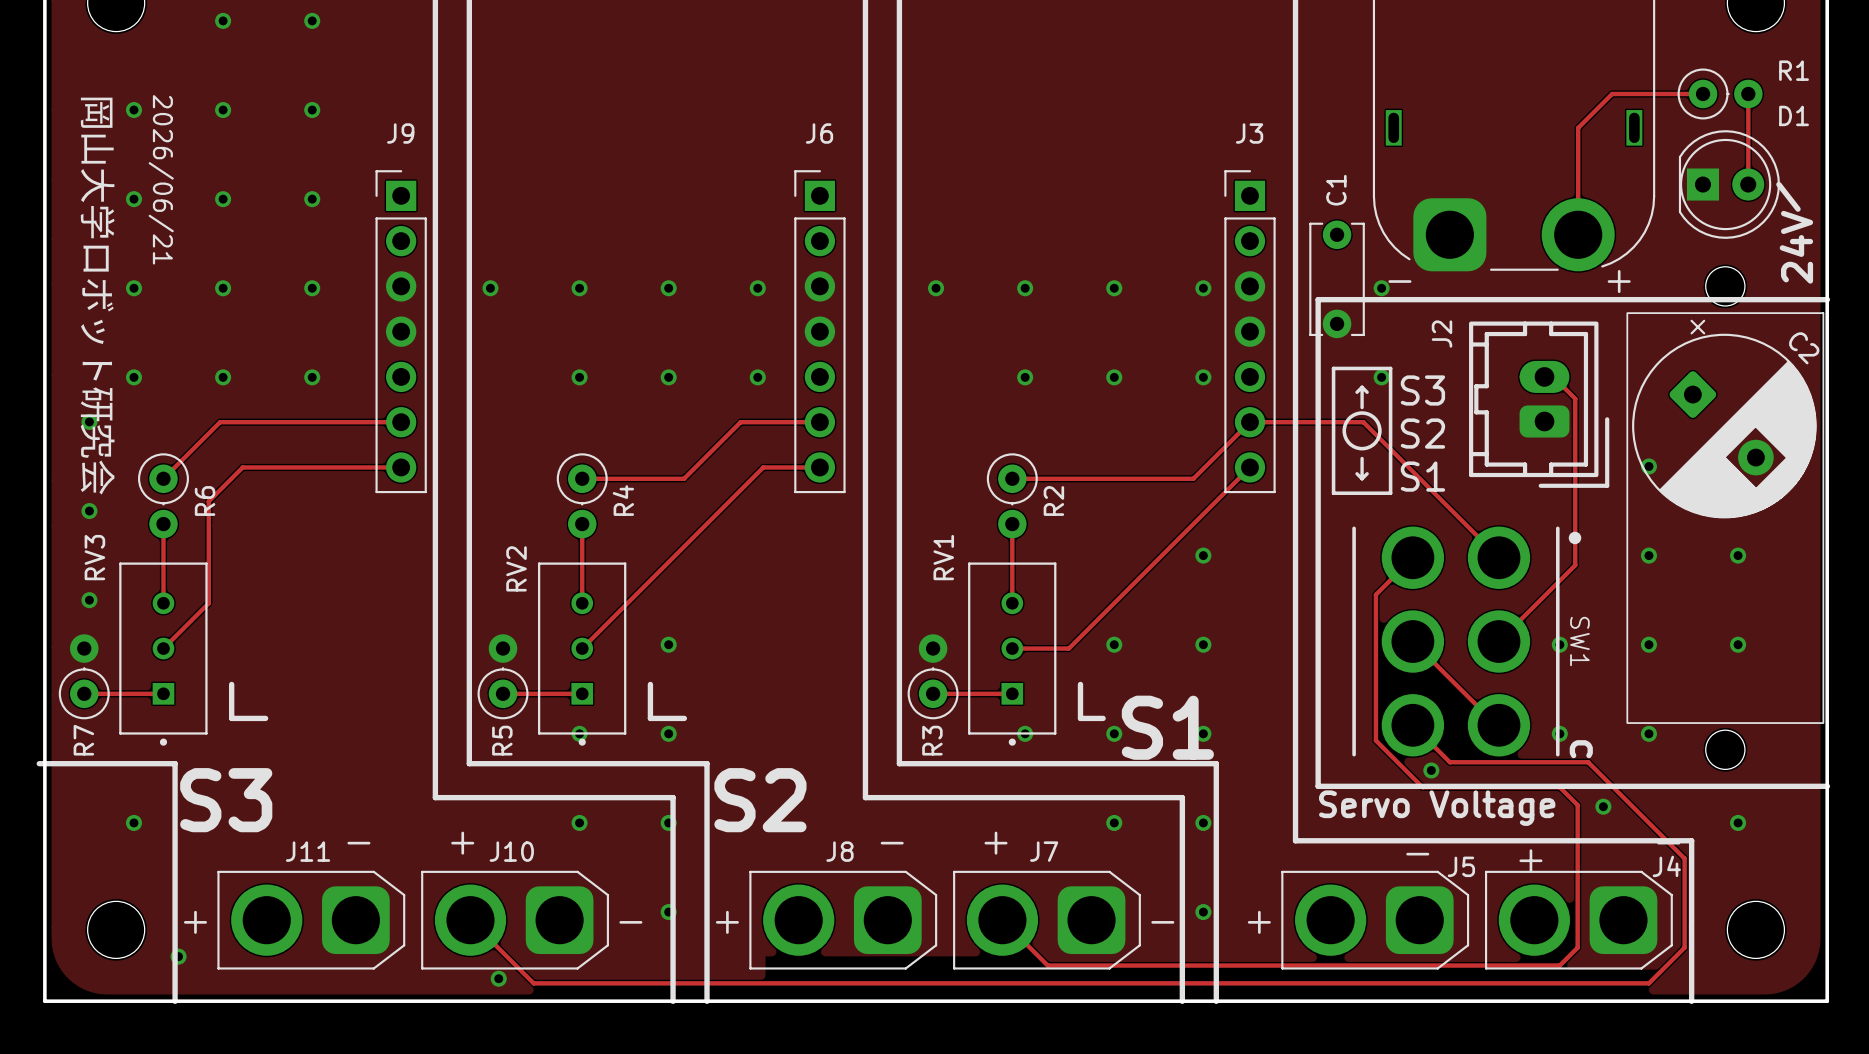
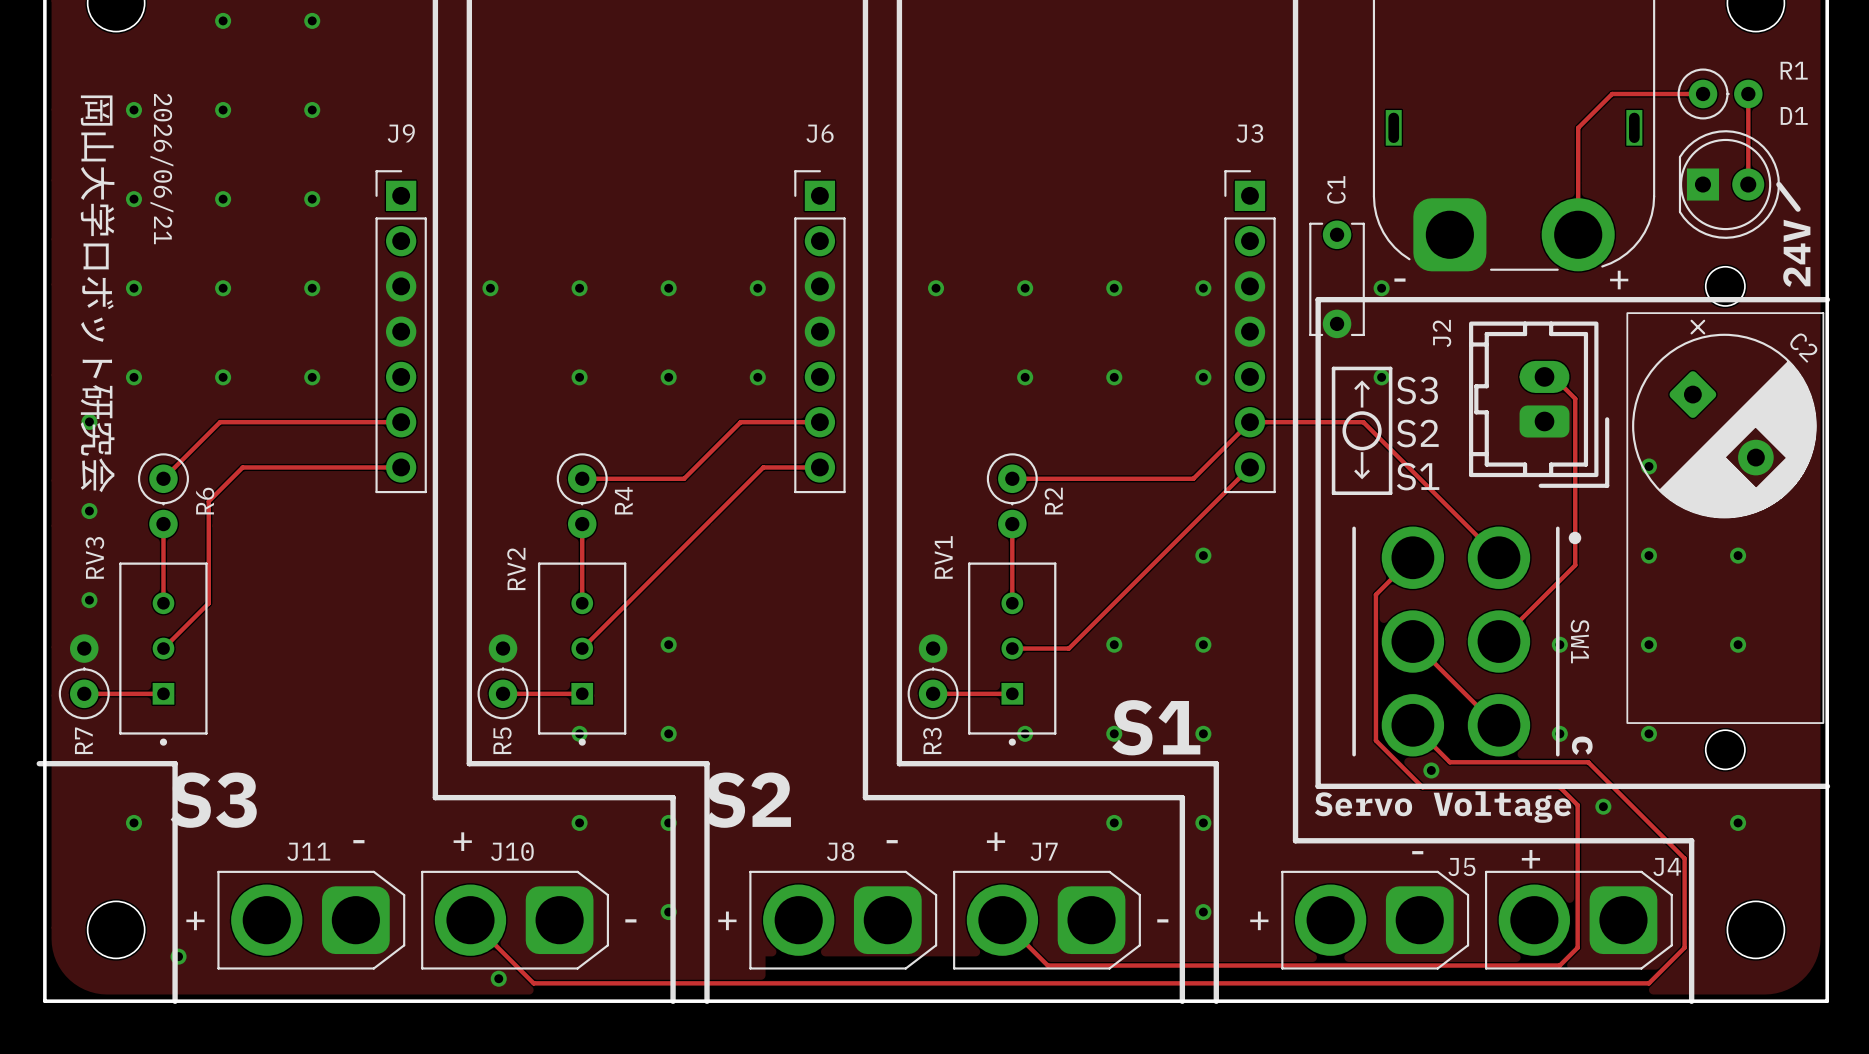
line: (231, 684) (231, 718) (265, 718) -> none
line: (650, 684) (650, 718) (684, 718) -> none
line: (1080, 684) (1080, 718) (1103, 718) -> none

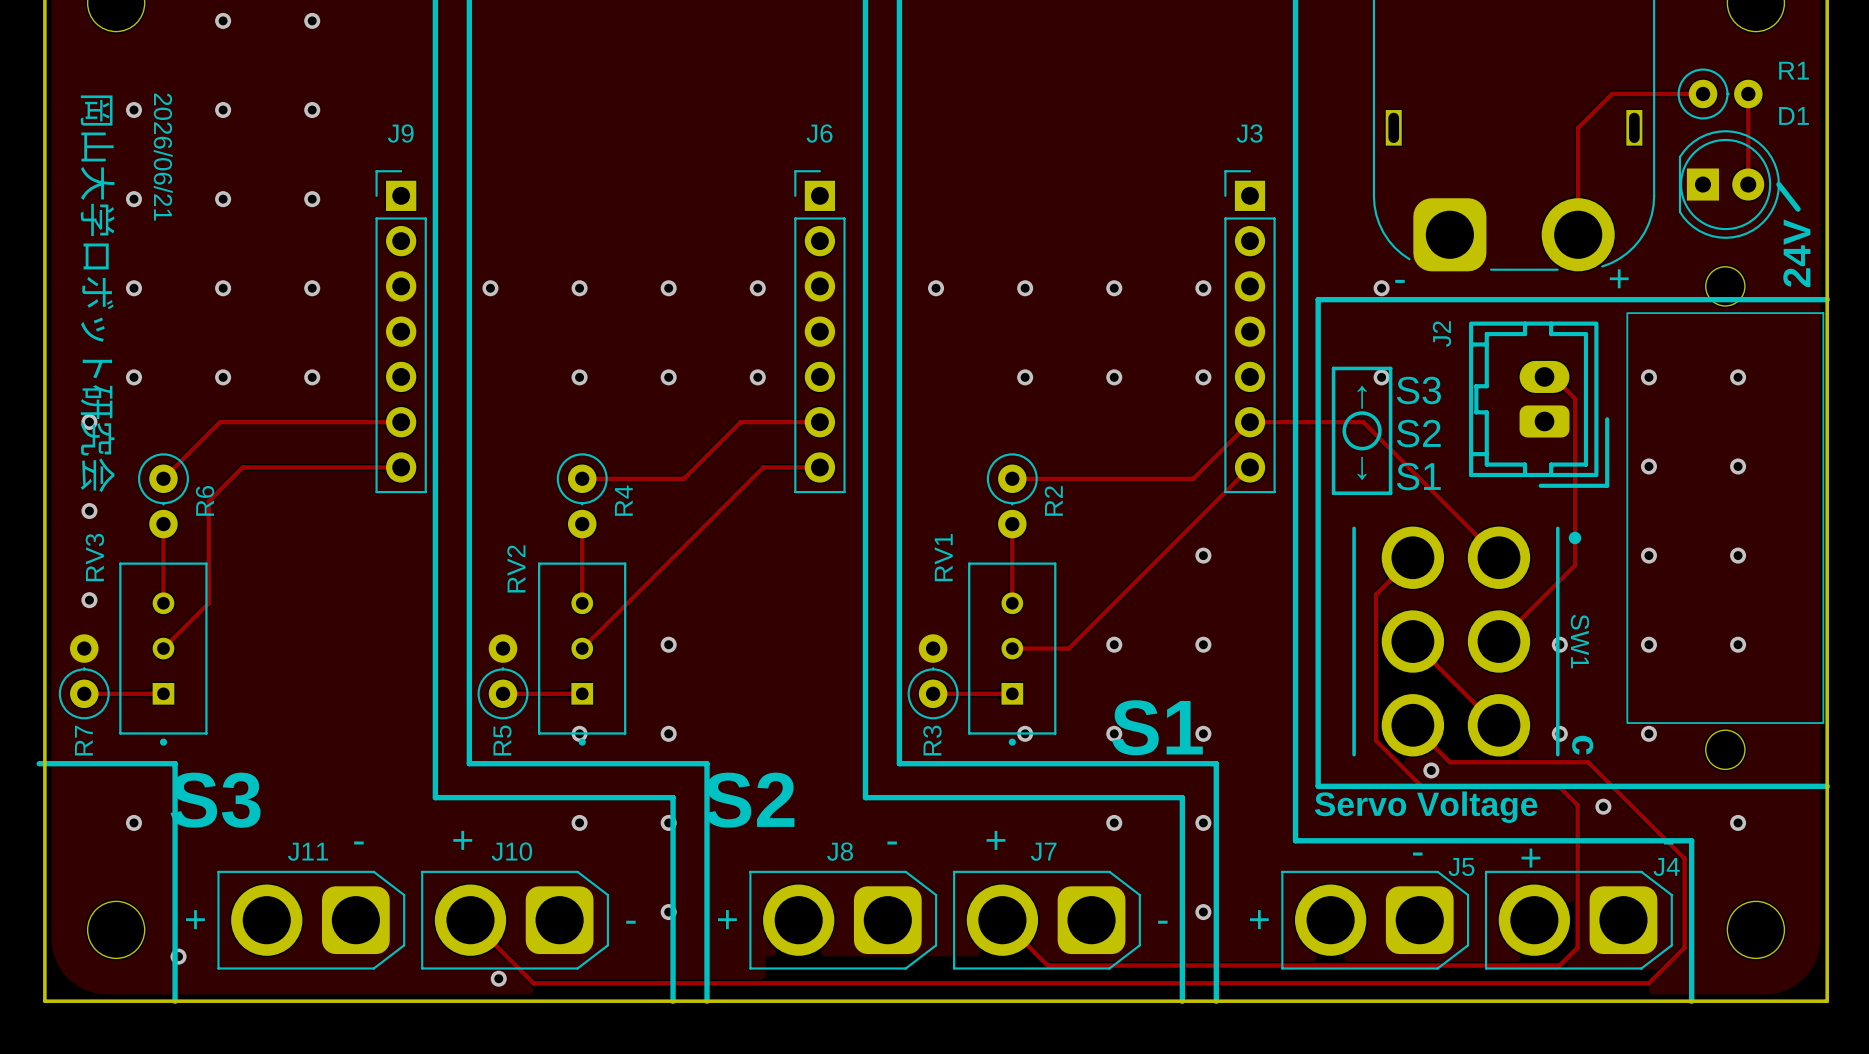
C1: (1337, 279) -> none
via: none -> (1648, 377)
via: none -> (1738, 377)
C2: (1724, 419) -> none
via: none -> (1738, 466)

